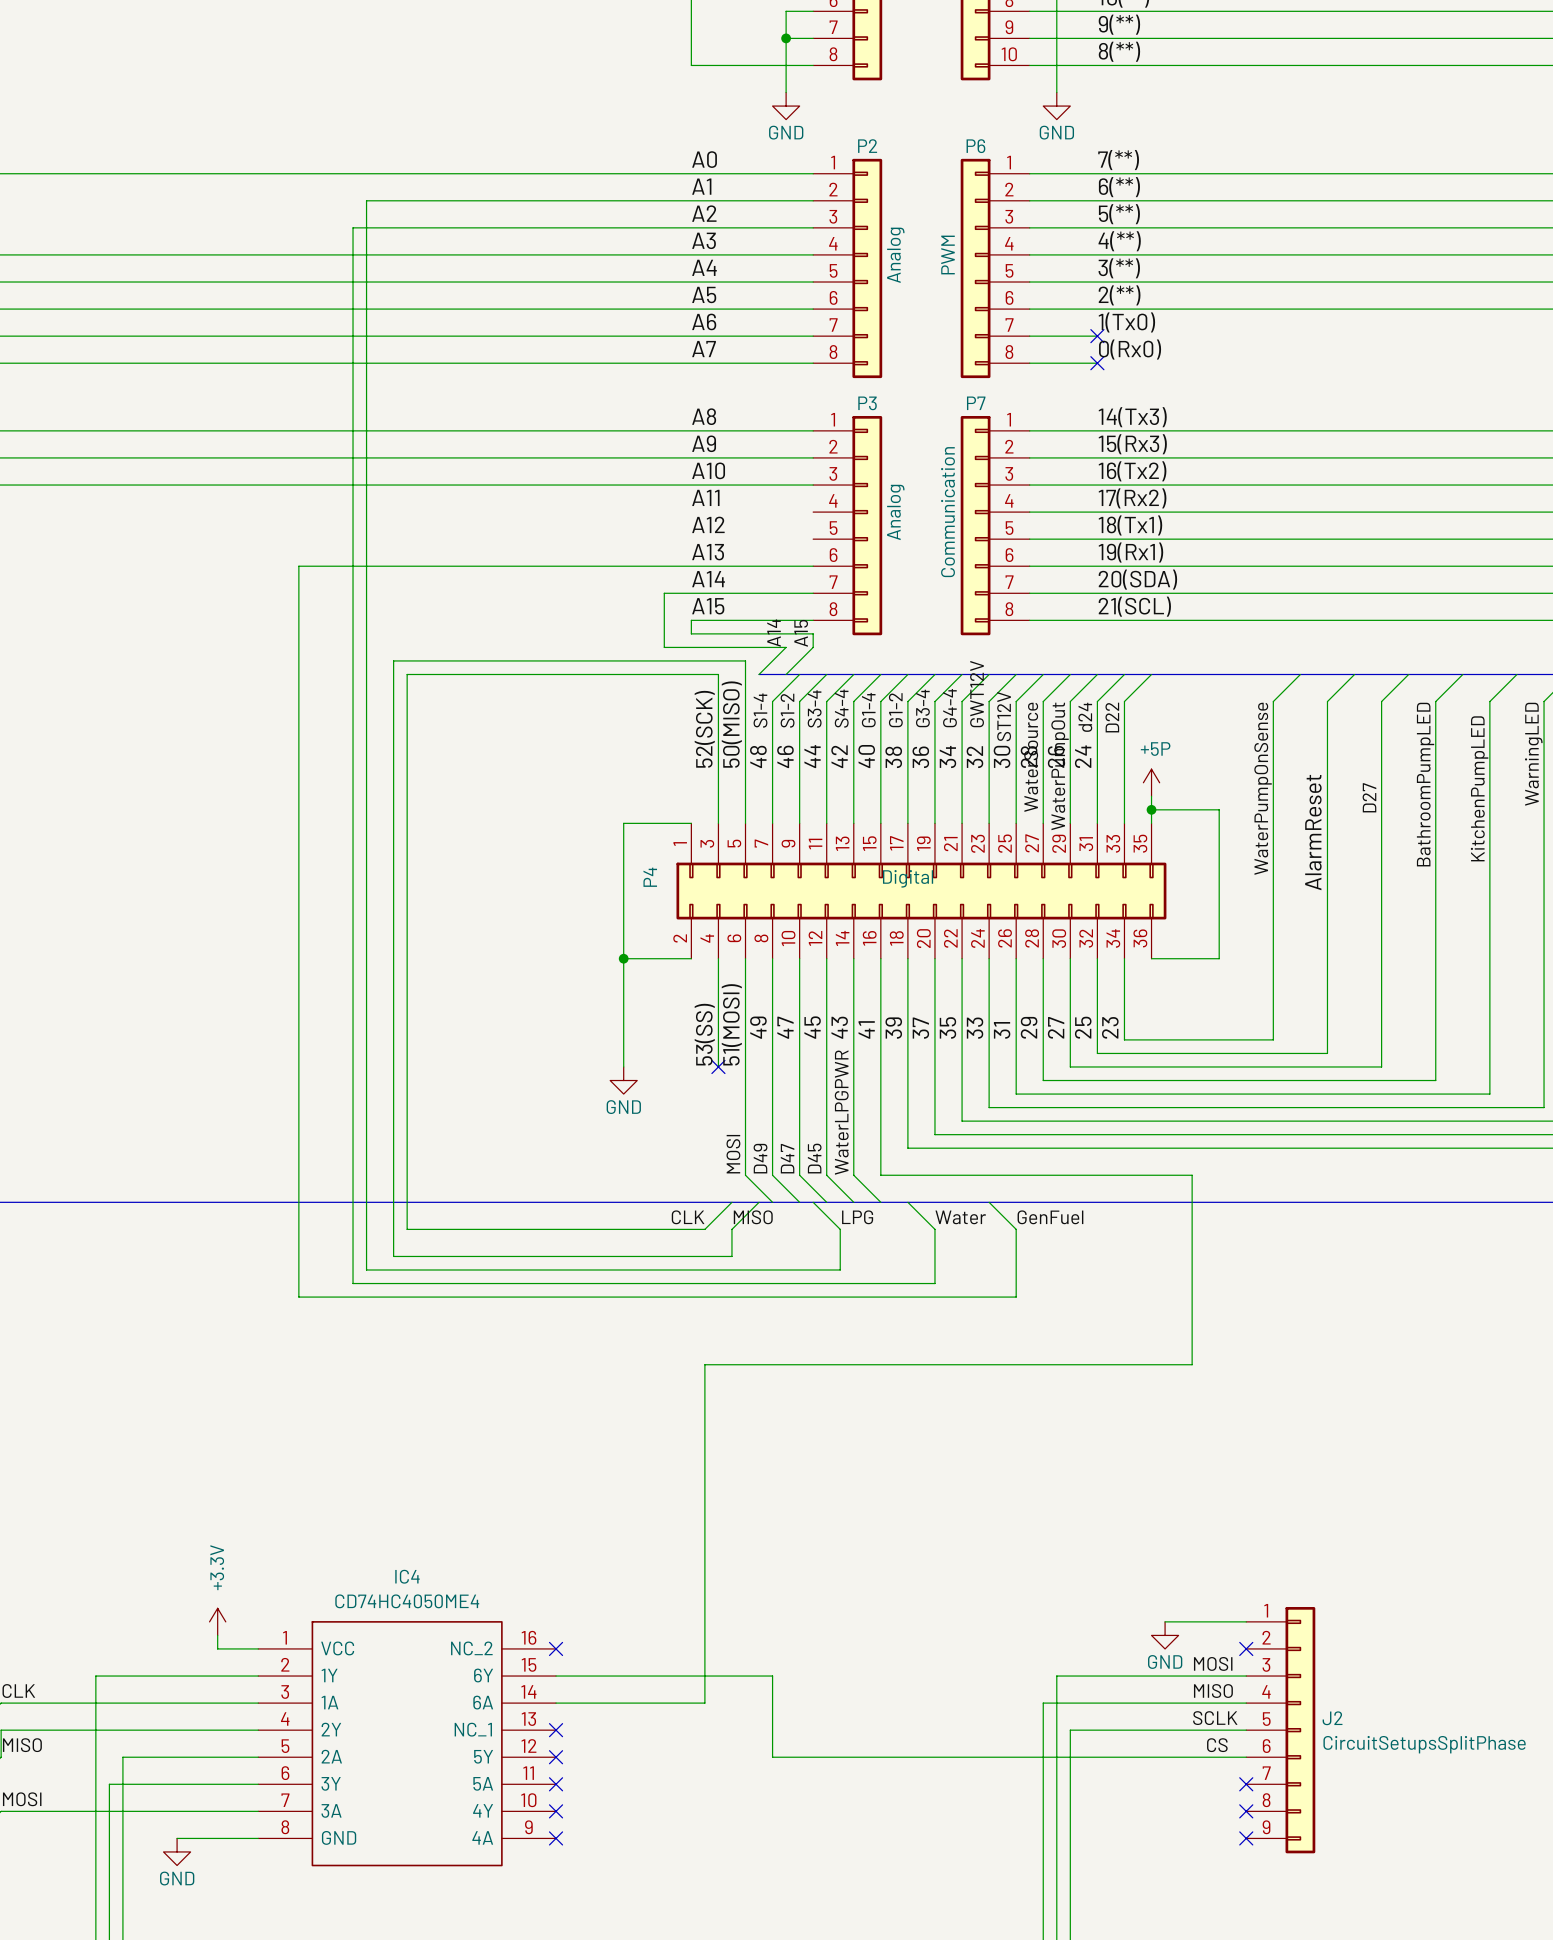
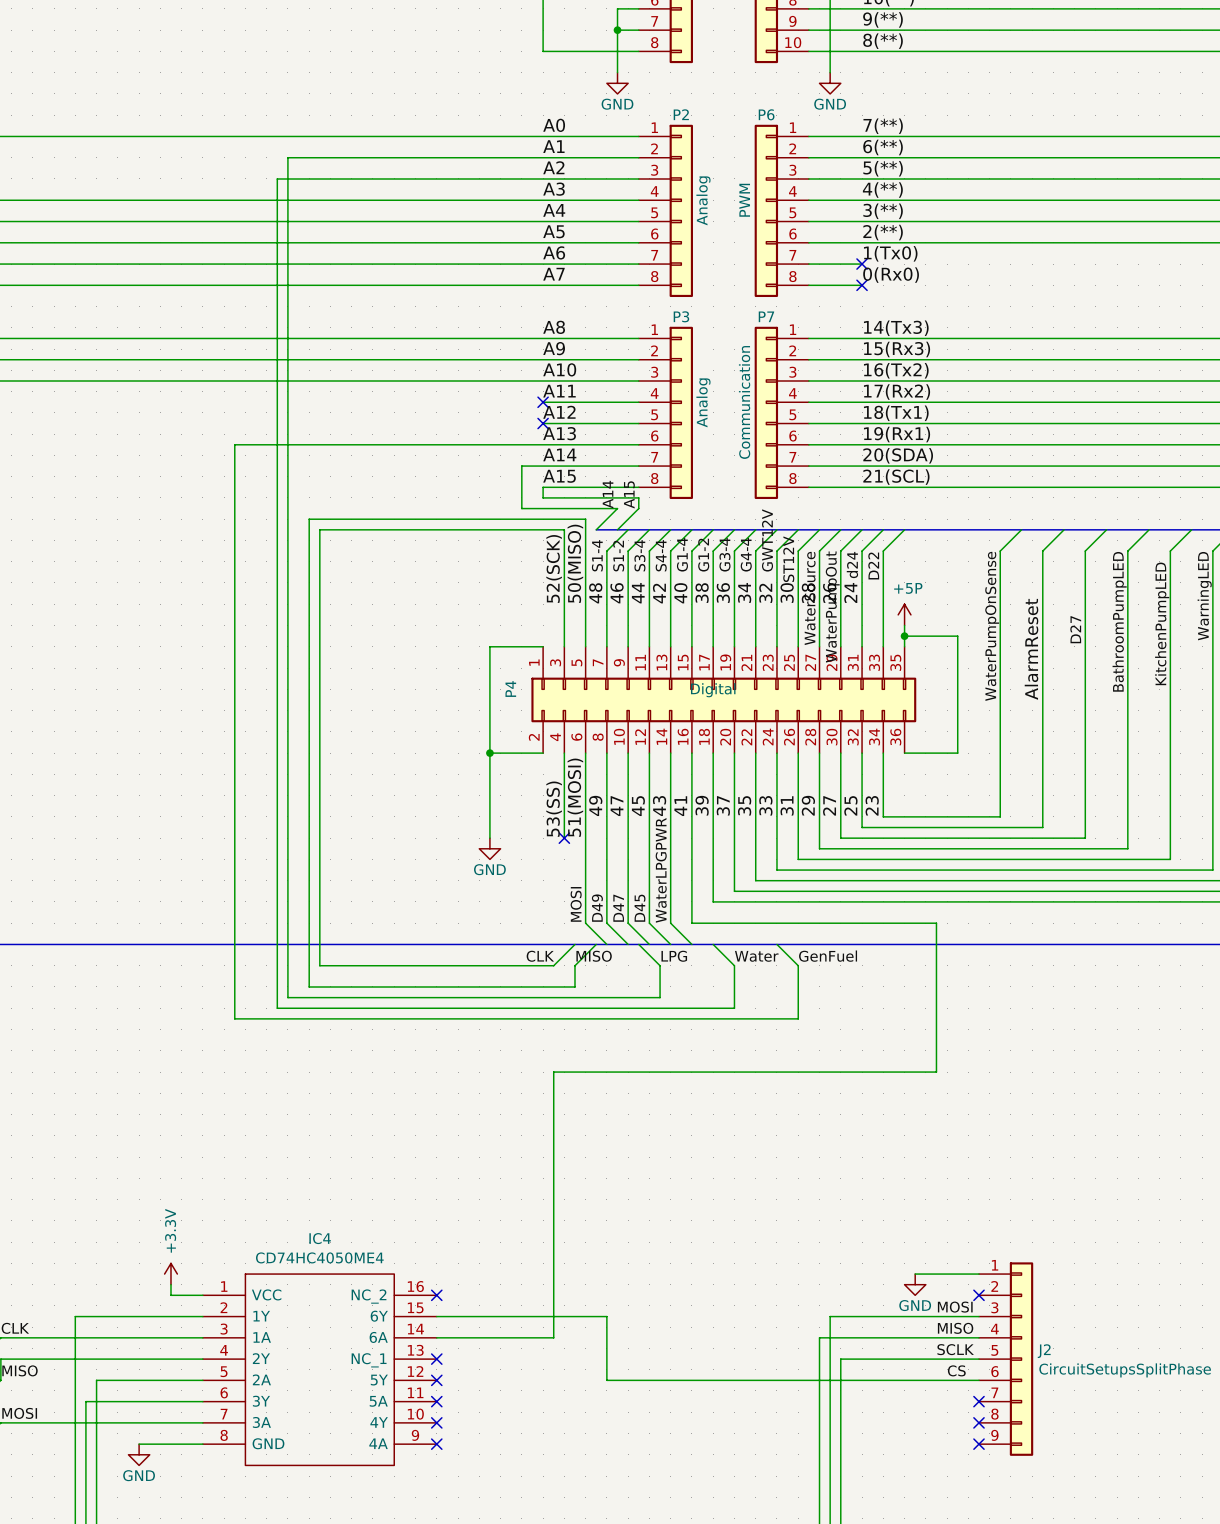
wire: none -> (543, 402) (638, 402)
no-connect mark: none -> (543, 402)
wire: none -> (543, 423) (638, 423)
no-connect mark: none -> (543, 423)

